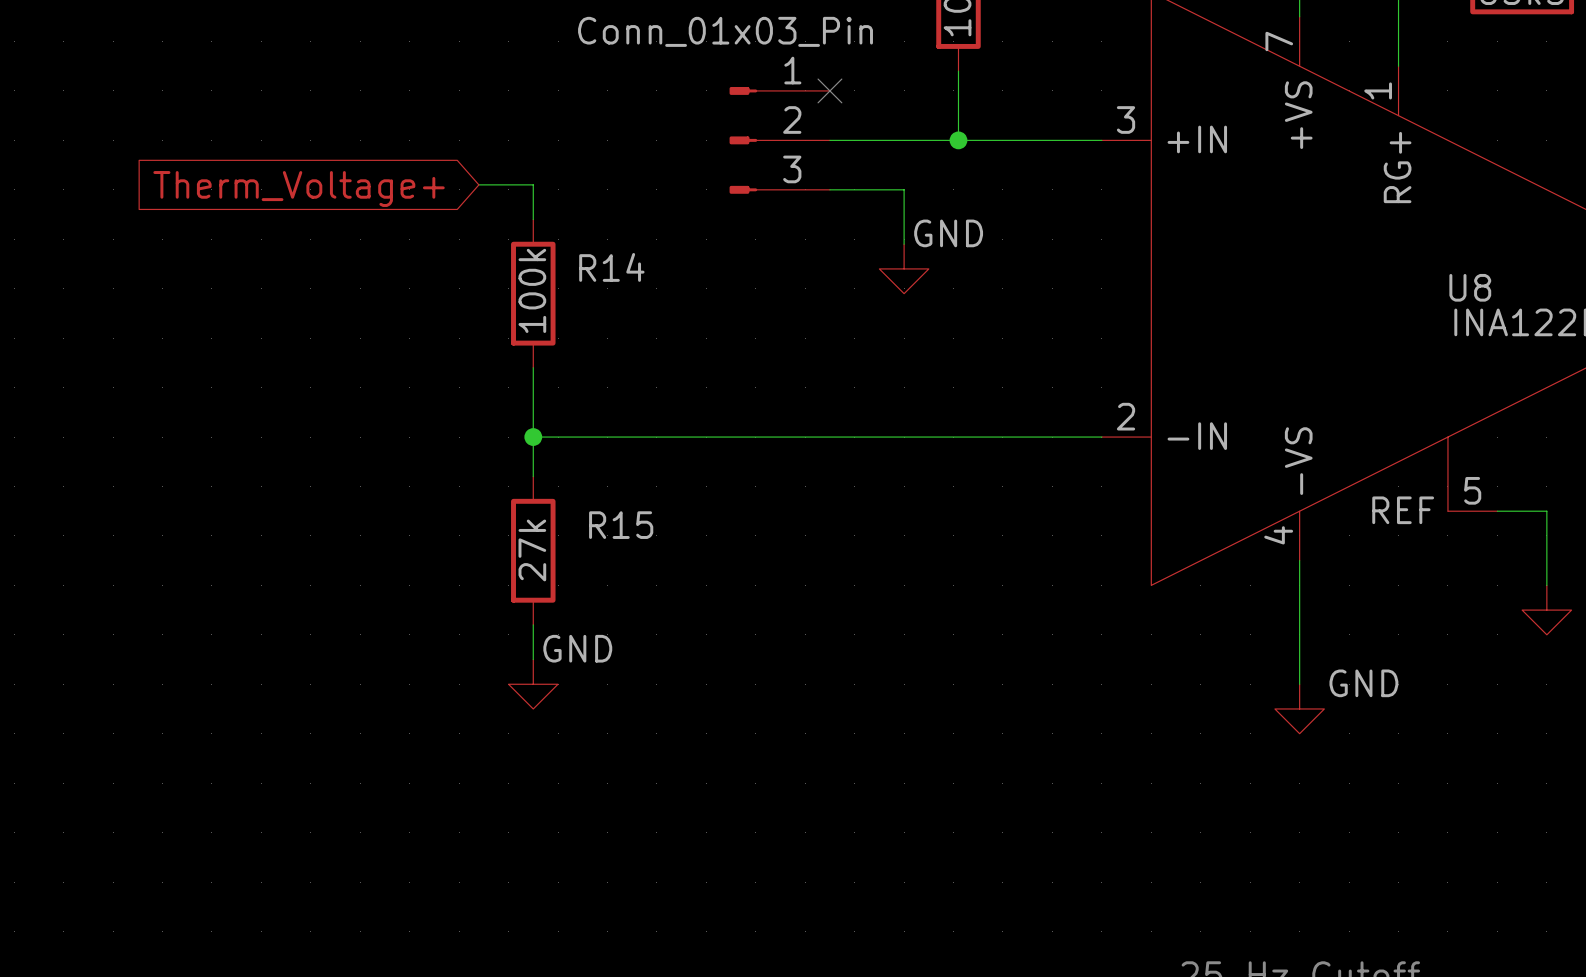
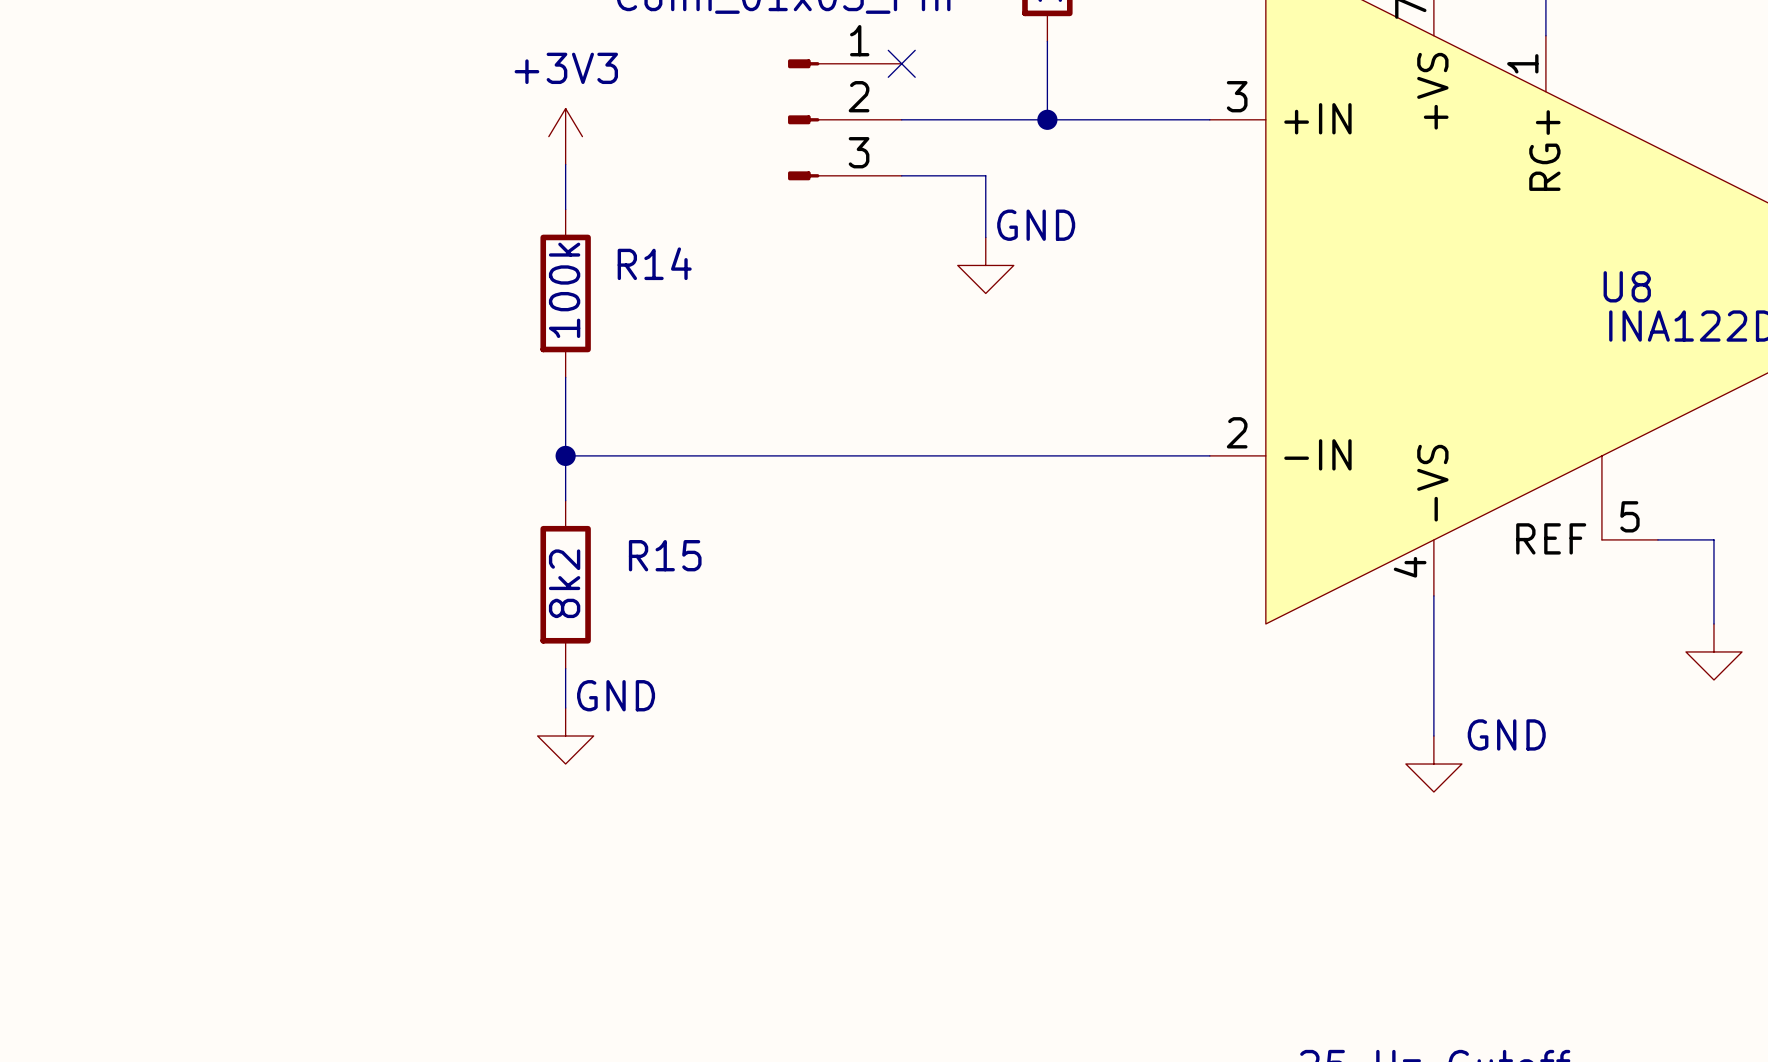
power symbol: none -> +3V3 (565, 136)
wire: (478, 184) (533, 184) -> (565, 164) (565, 170)
global label: Therm_Voltage+ (299, 189) -> none
R15 value: 27k (532, 550) -> 8k2 (564, 583)

